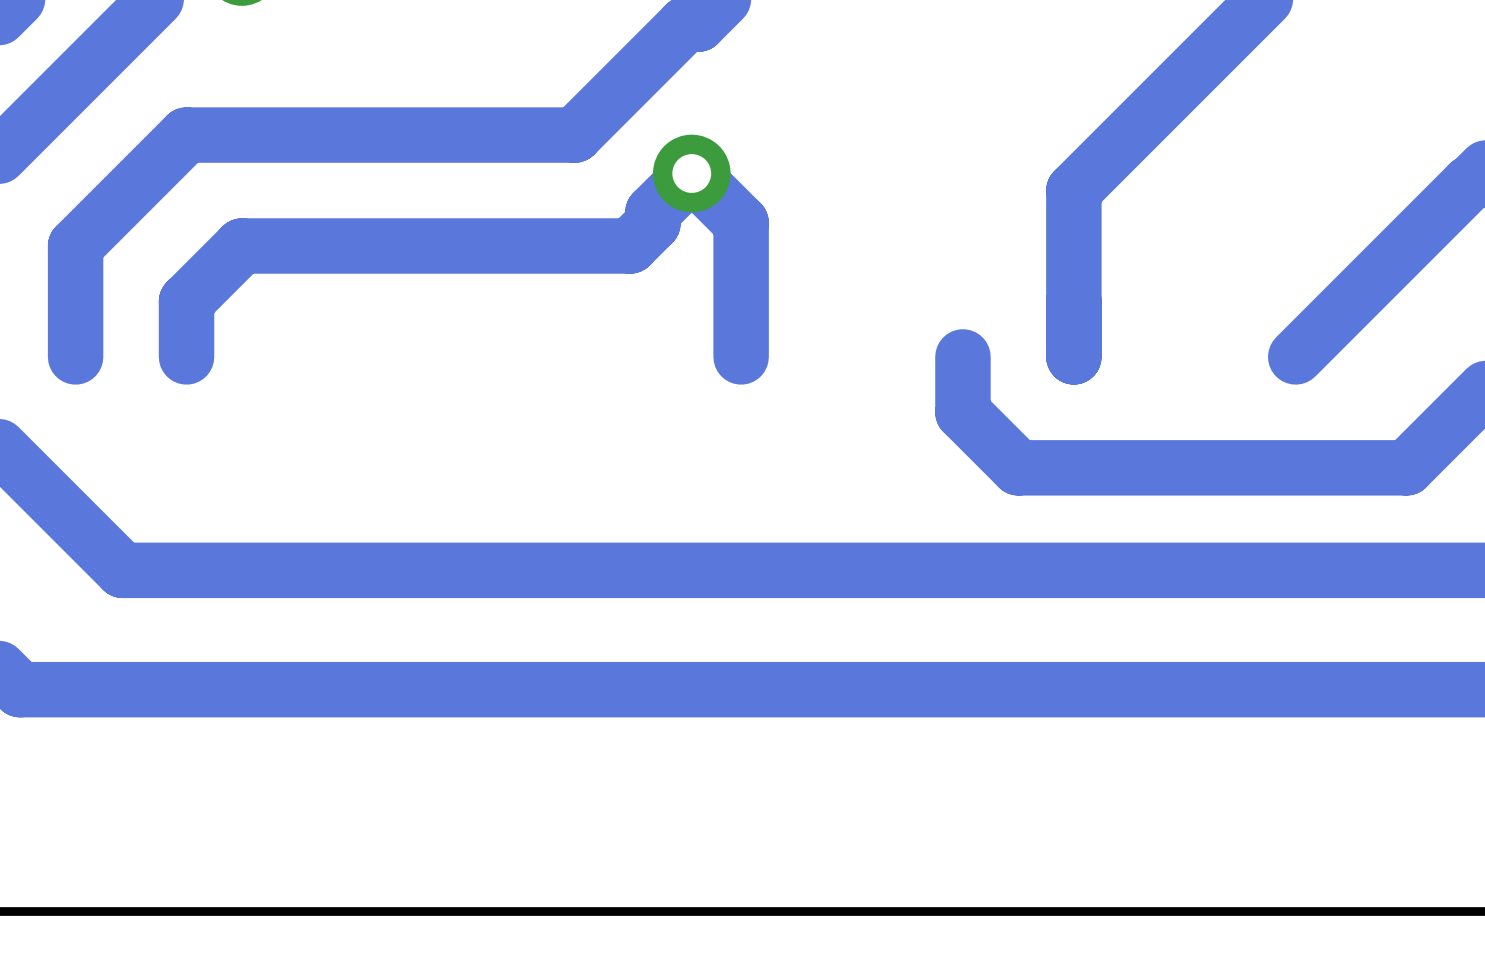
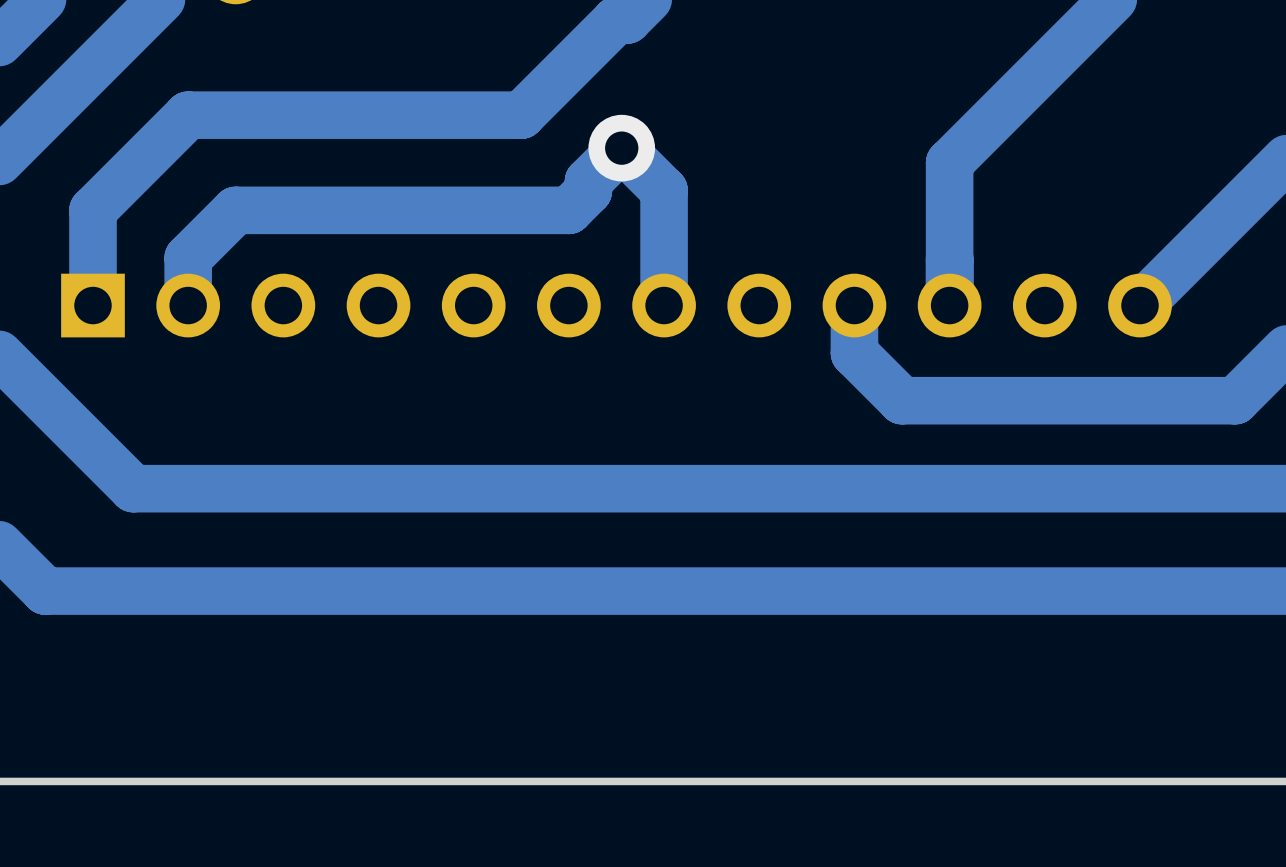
part: none -> (616, 305)

